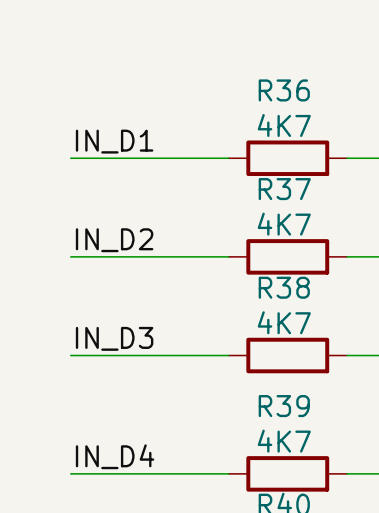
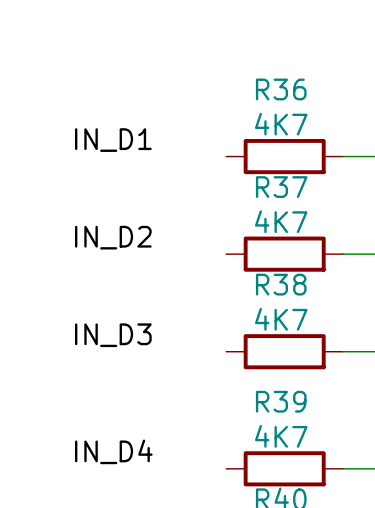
wire: (70, 158) (228, 158) -> none
wire: (70, 256) (228, 256) -> none
wire: (70, 355) (228, 355) -> none
wire: (70, 473) (228, 473) -> none

